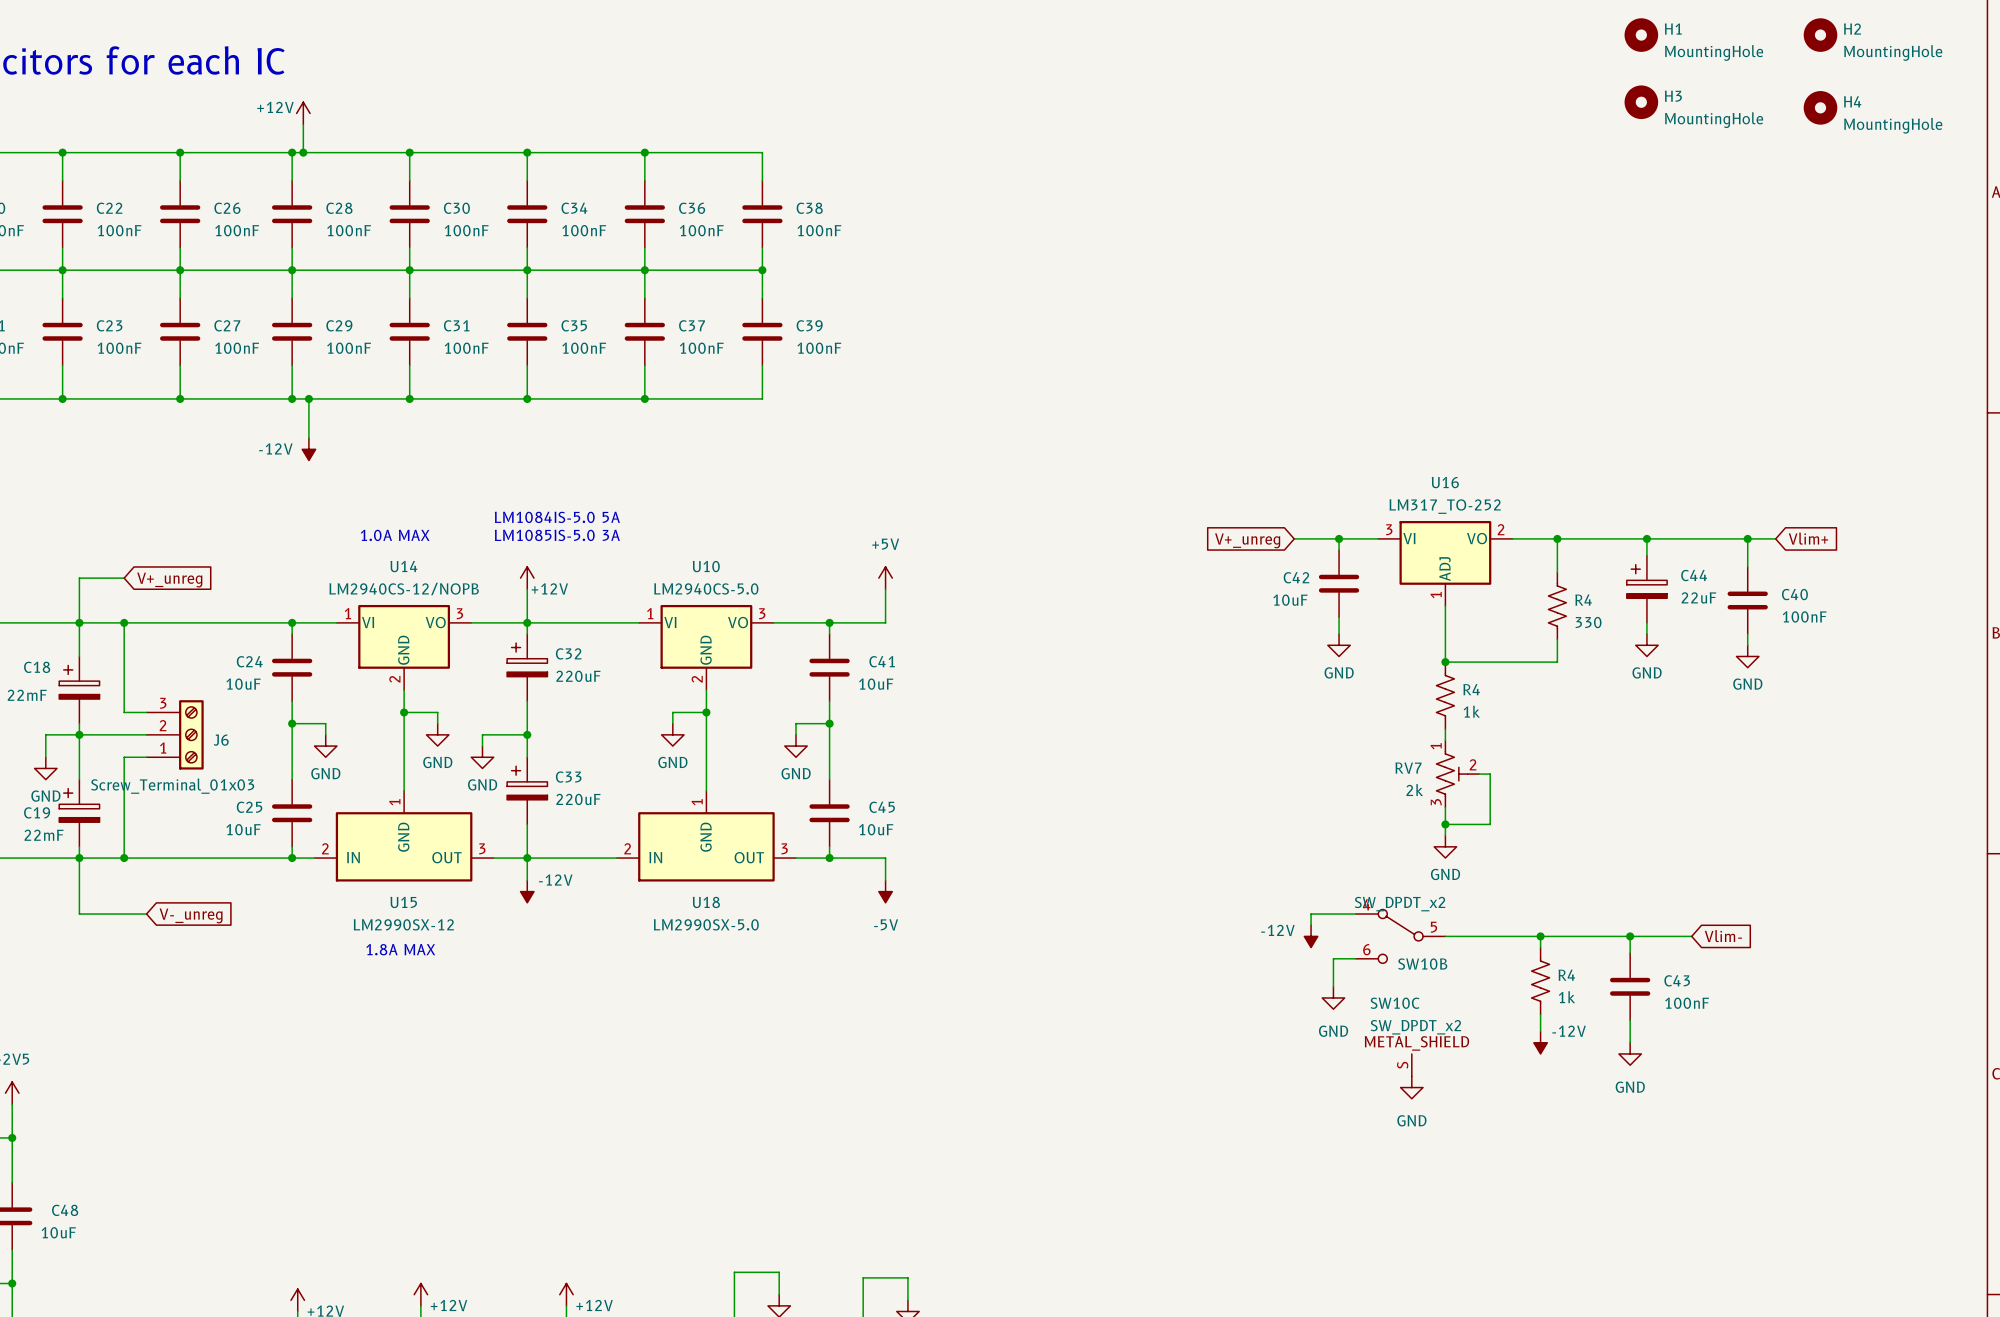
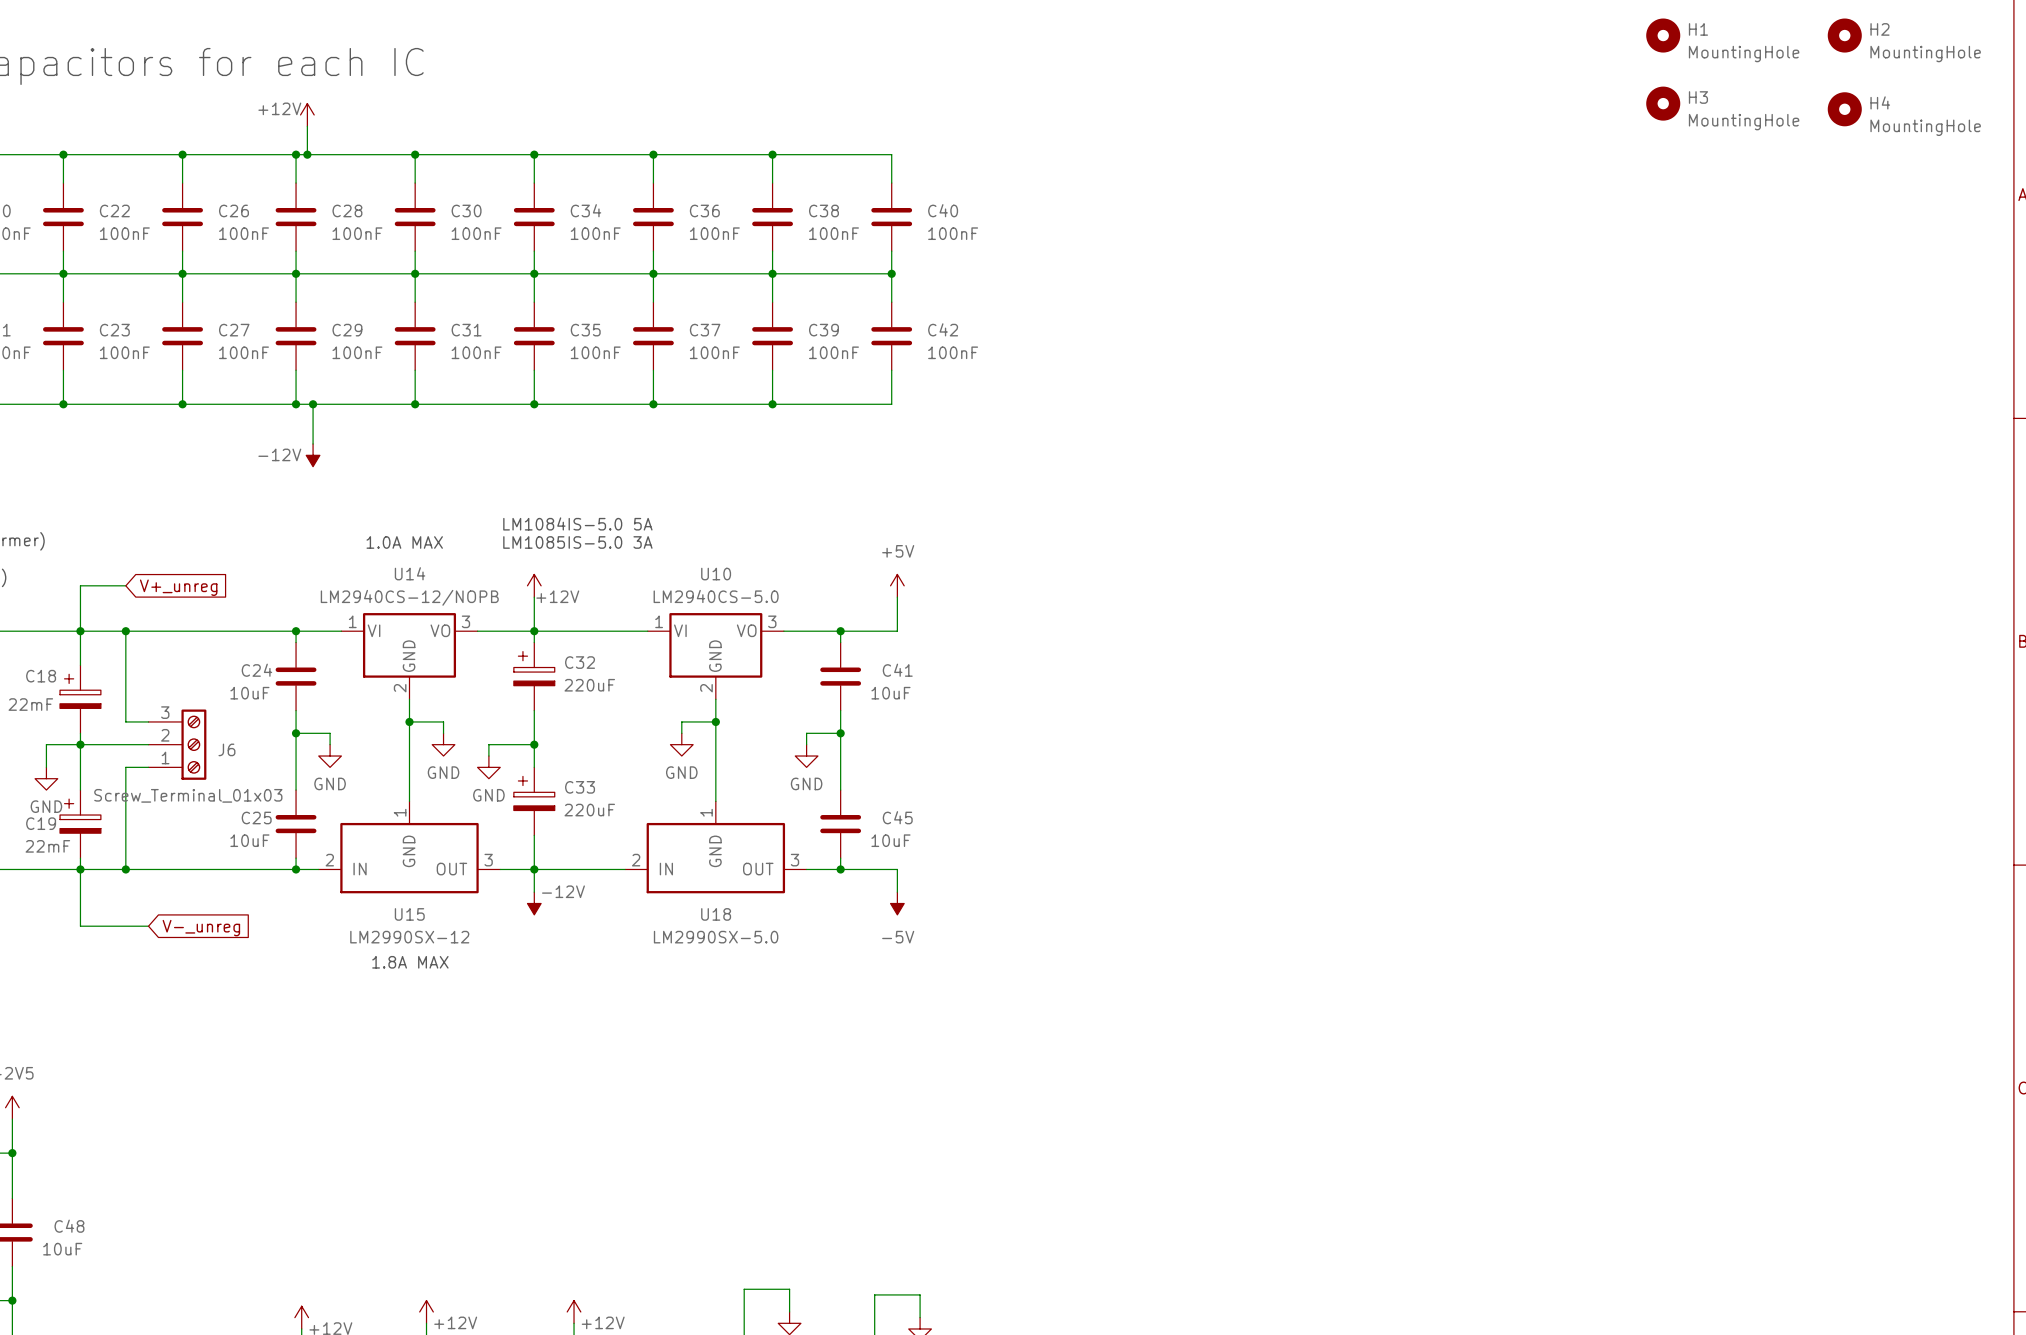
wire: none -> (772, 154) (891, 154) (891, 183)
junction: none -> (772, 154)
wire: none -> (891, 251) (891, 302)
wire: none -> (772, 273) (891, 273)
junction: none -> (891, 273)
wire: none -> (891, 370) (891, 404) (772, 404)
junction: none -> (772, 404)
wire: (1294, 538) (1378, 538) -> none
wire: (1339, 538) (1339, 550) -> none
junction: (1339, 538) -> none
wire: (1512, 538) (1775, 538) -> none
wire: (1557, 538) (1557, 572) -> none
junction: (1557, 538) -> none
wire: (1646, 538) (1646, 555) -> none
junction: (1646, 538) -> none
wire: (1747, 538) (1747, 566) -> none
junction: (1747, 538) -> none
global label: Vlim+ (1808, 538) -> none
global label: V+_unreg (1247, 540) -> none
U16: LM317_TO-252 (1445, 563) -> none
C42 name position: C42 (1296, 577) -> C42 (943, 329)
C42 position: (1339, 583) -> (891, 336)
C44: 22uF (1646, 589) -> none
C42 value: 10uF (1290, 600) -> 100nF (953, 352)
C40 position: (1747, 600) -> (891, 217)
wire: (1445, 606) (1445, 662) (1557, 662) (1557, 639) -> none
R4: 330 (1557, 606) -> none
wire: (1339, 617) (1339, 634) -> none
wire: (1646, 622) (1646, 634) -> none
wire: (1747, 634) (1747, 645) -> none
power symbol: GND (1339, 645) -> none
power symbol: GND (1646, 645) -> none
power symbol: GND (1747, 656) -> none
junction: (1445, 662) -> none
R4: 1k (1445, 695) -> none
wire: (1445, 729) (1445, 740) -> none
RV7: 2k (1457, 774) -> none
wire: (1478, 774) (1490, 774) (1490, 824) (1445, 824) -> none
wire: (1445, 807) (1445, 835) -> none
junction: (1445, 824) -> none
power symbol: GND (1445, 846) -> none
wire: (1355, 914) (1311, 914) (1311, 925) -> none
power symbol: -12V (1311, 936) -> none
SW10B: SW_DPDT_x2 (1400, 936) -> none
wire: (1445, 936) (1691, 936) -> none
wire: (1540, 936) (1540, 947) -> none
junction: (1540, 936) -> none
wire: (1630, 936) (1630, 953) -> none
junction: (1630, 936) -> none
global label: Vlim- (1723, 936) -> none
wire: (1355, 958) (1333, 958) (1333, 986) -> none
R4: 1k (1540, 981) -> none
C43: 100nF (1630, 986) -> none
power symbol: GND (1333, 997) -> none
wire: (1540, 1014) (1540, 1031) -> none
wire: (1630, 1020) (1630, 1042) -> none
power symbol: -12V (1540, 1042) -> none
power symbol: GND (1630, 1053) -> none
SW10C: SW_DPDT_x2 (1411, 1065) -> none
power symbol: GND (1411, 1087) -> none

